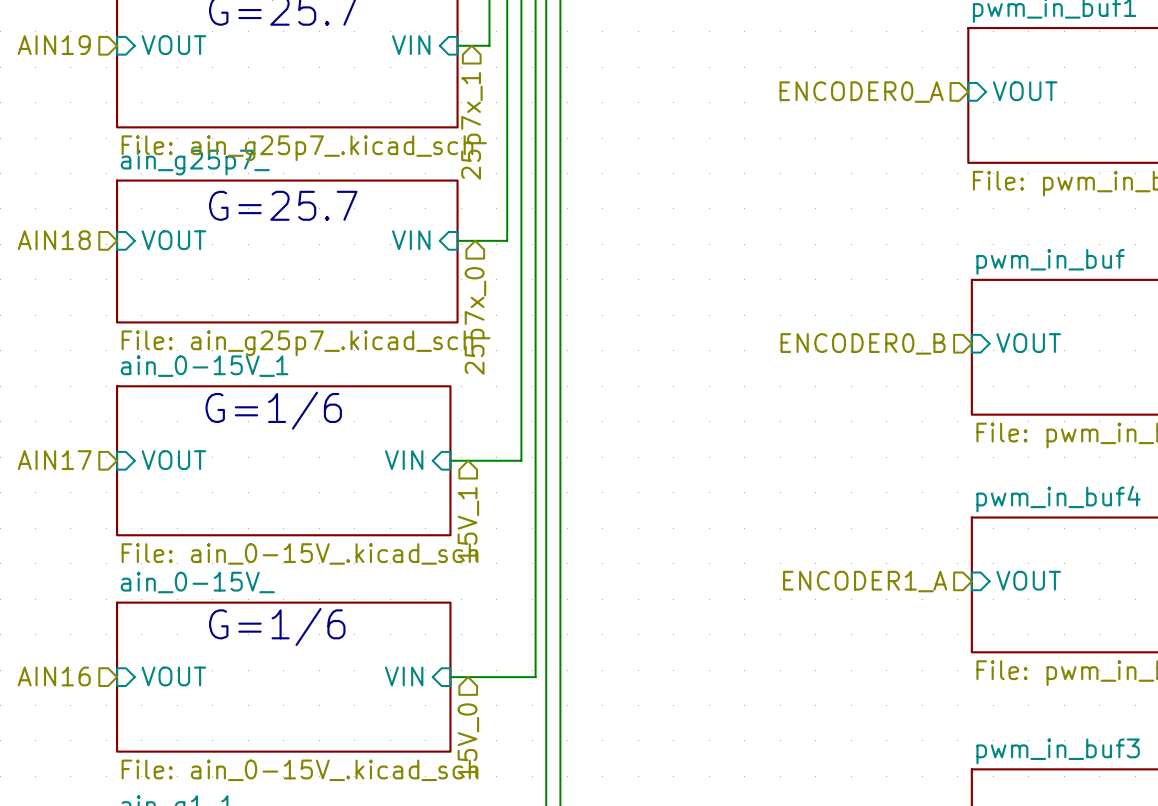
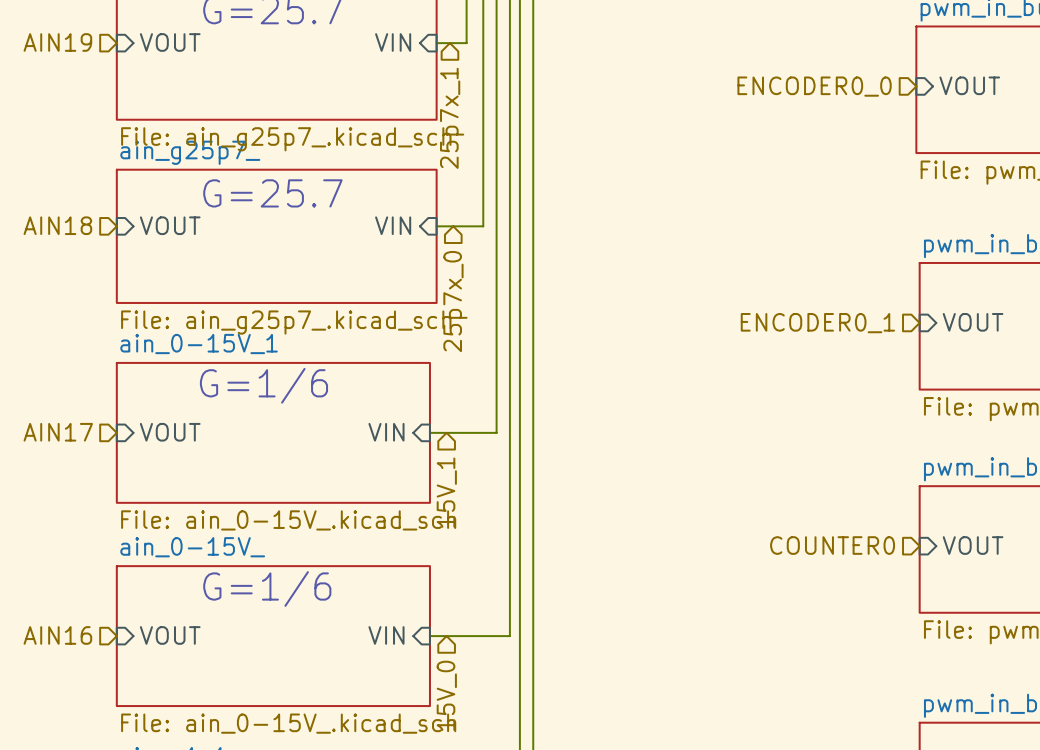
hierarchical label: ENCODER0_A (861, 92) -> ENCODER0_0 (814, 86)
hierarchical label: ENCODER0_B (863, 343) -> ENCODER0_1 (817, 323)
hierarchical label: ENCODER1_A (865, 581) -> COUNTER0 (832, 545)

